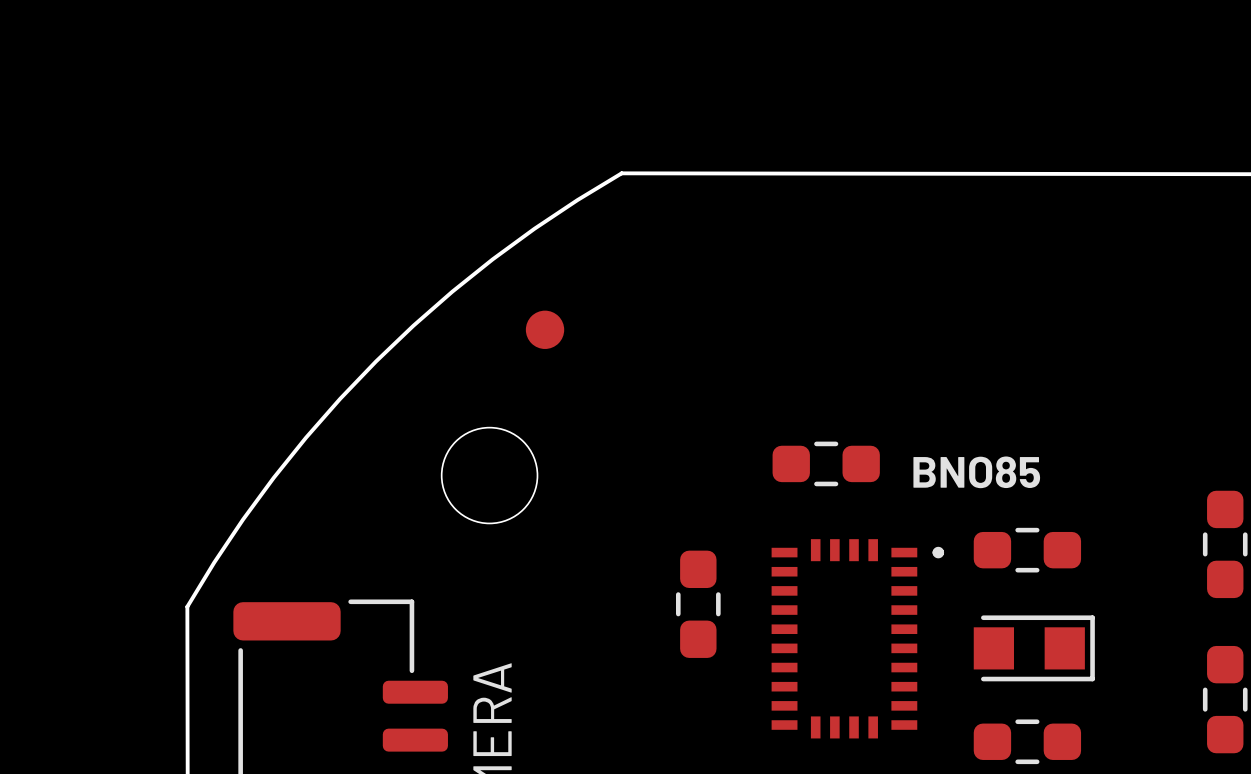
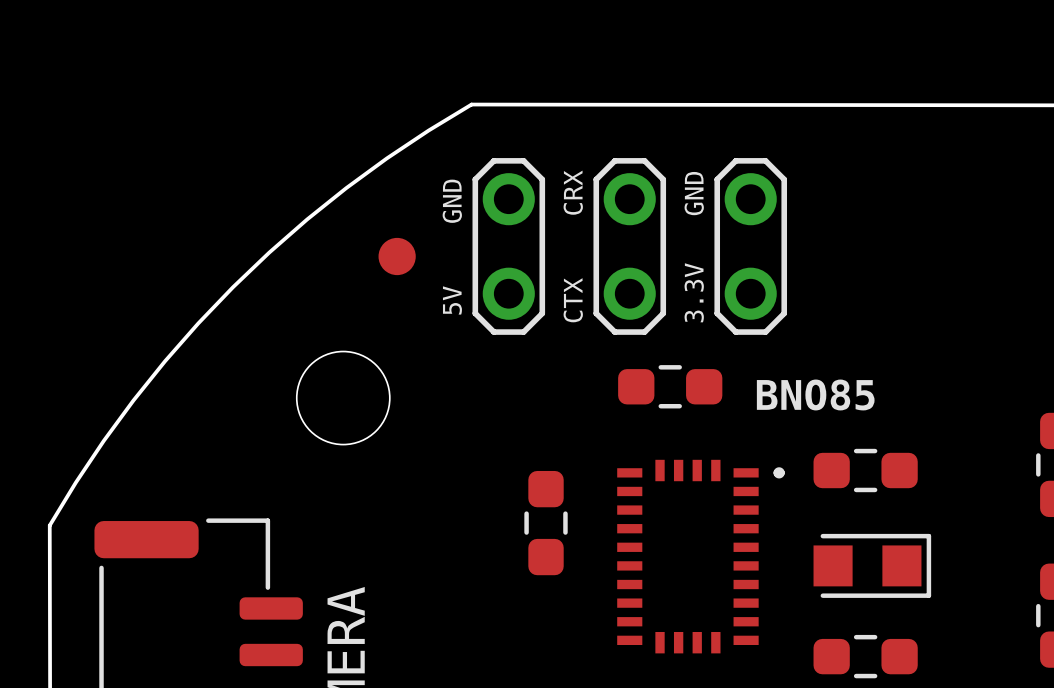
part: none -> (508, 246)
text: none -> CTX CRX (573, 246)
part: none -> (629, 246)
part: none -> (750, 246)
text: none -> 5V GND (452, 247)
text: none -> 3.3V GND (694, 247)

